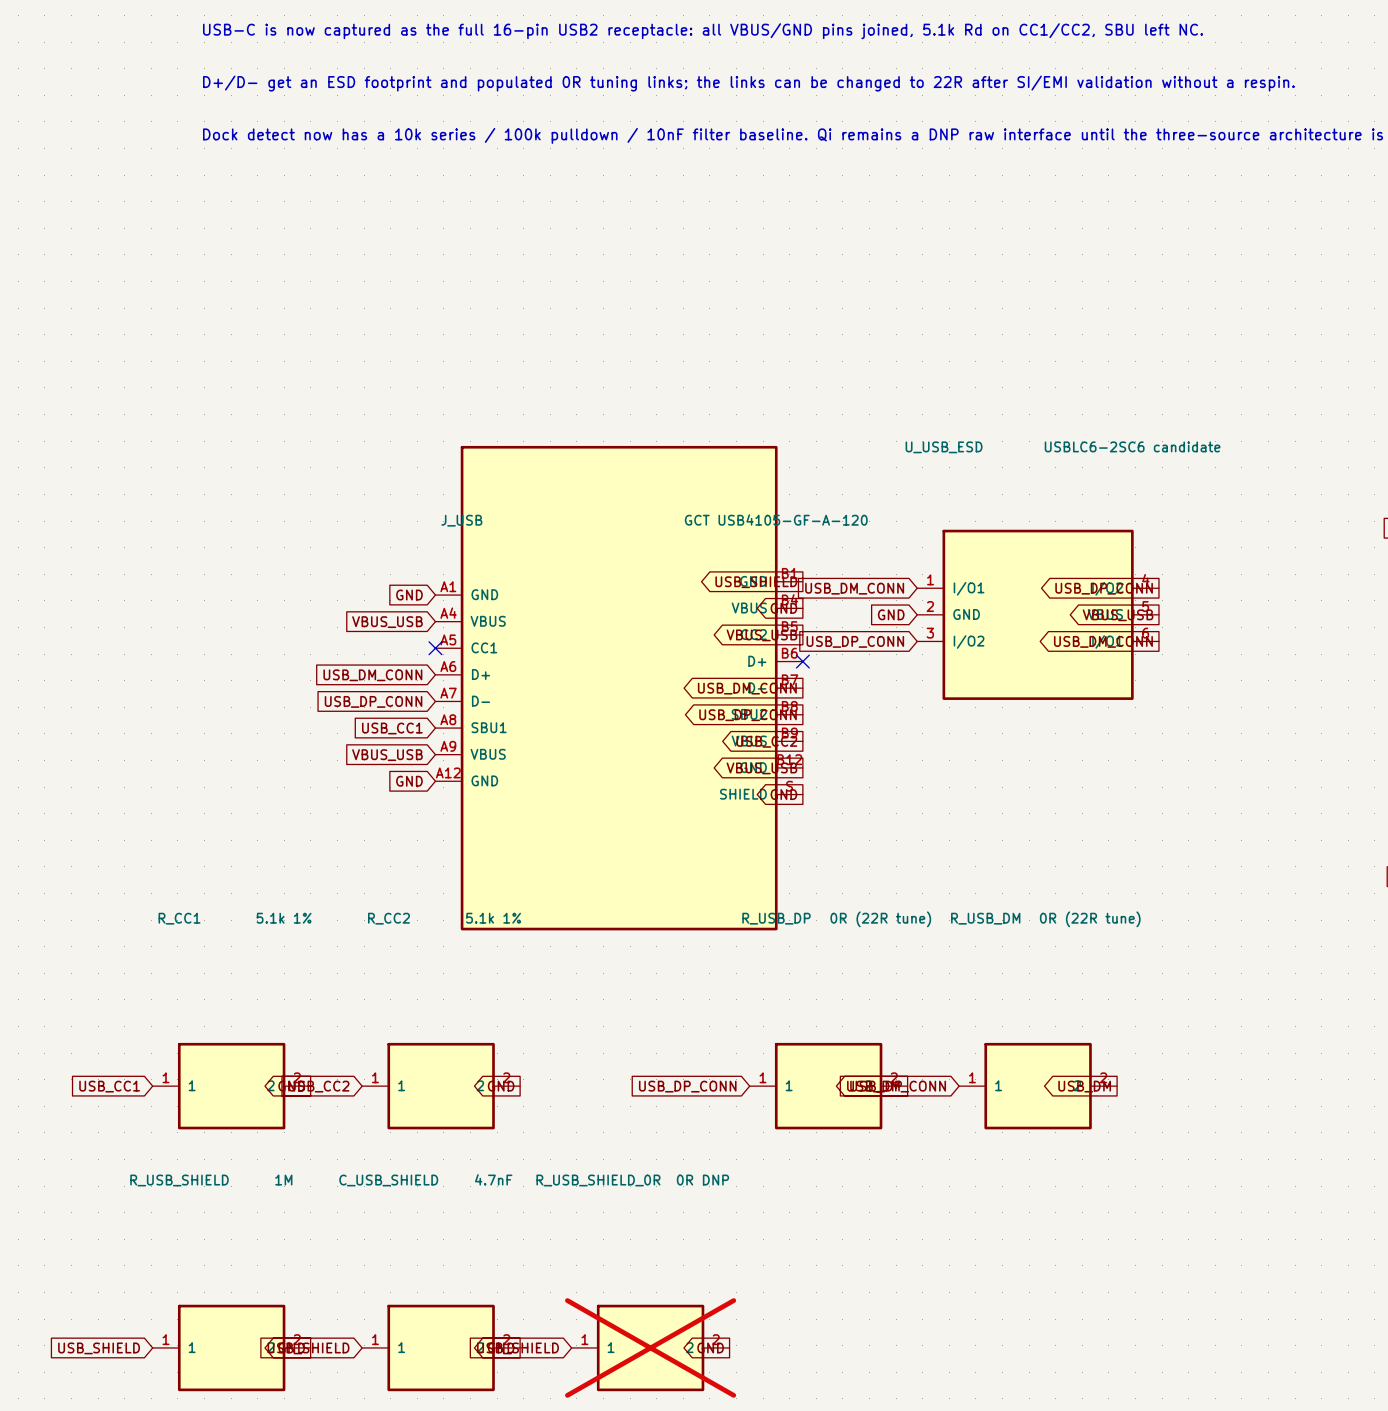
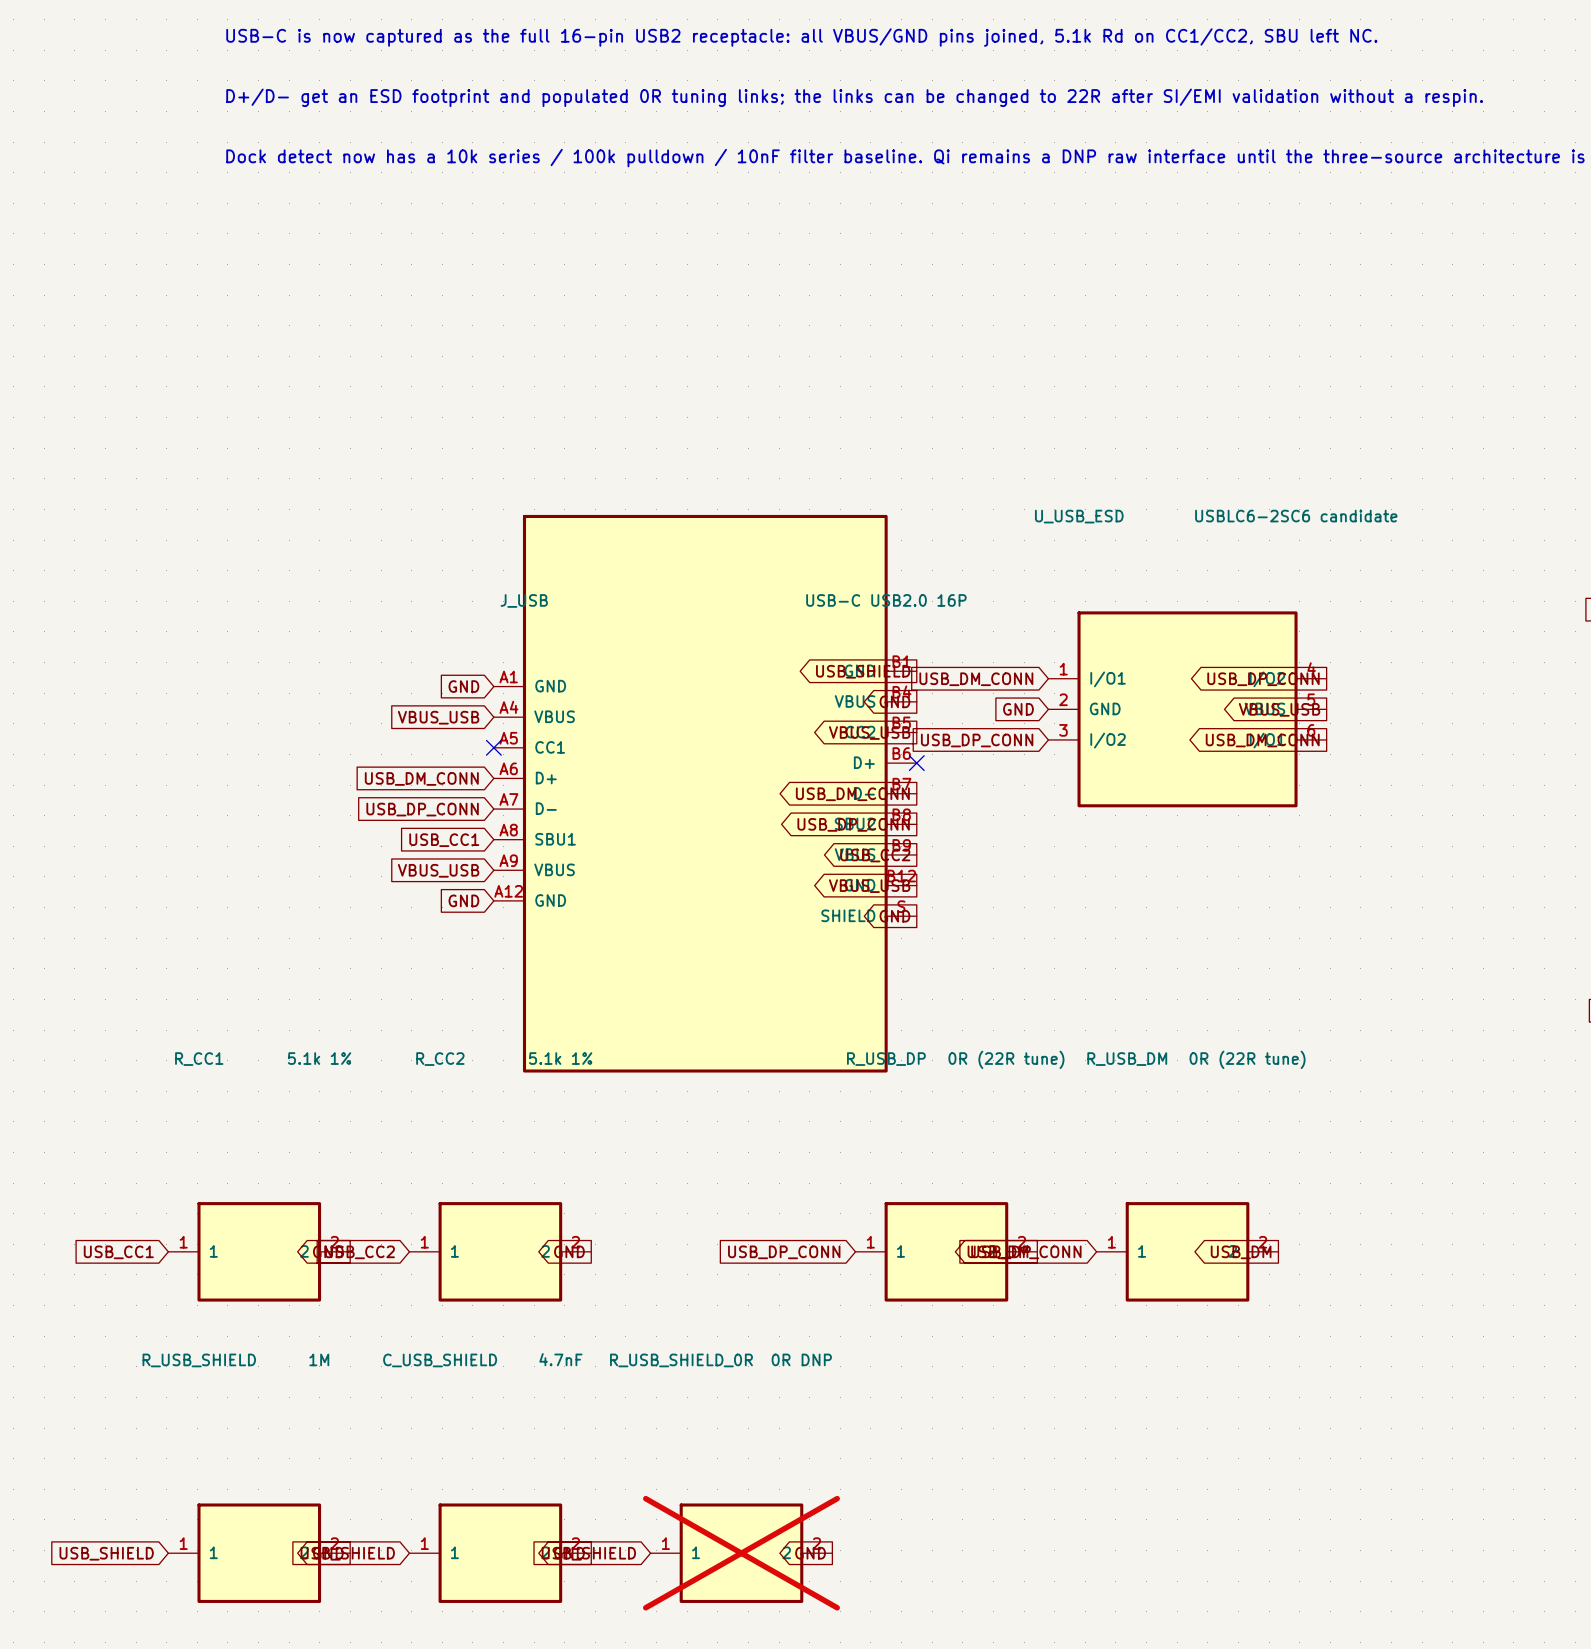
J_USB value: GCT USB4105-GF-A-120 (776, 520) -> USB-C USB2.0 16P (886, 600)

